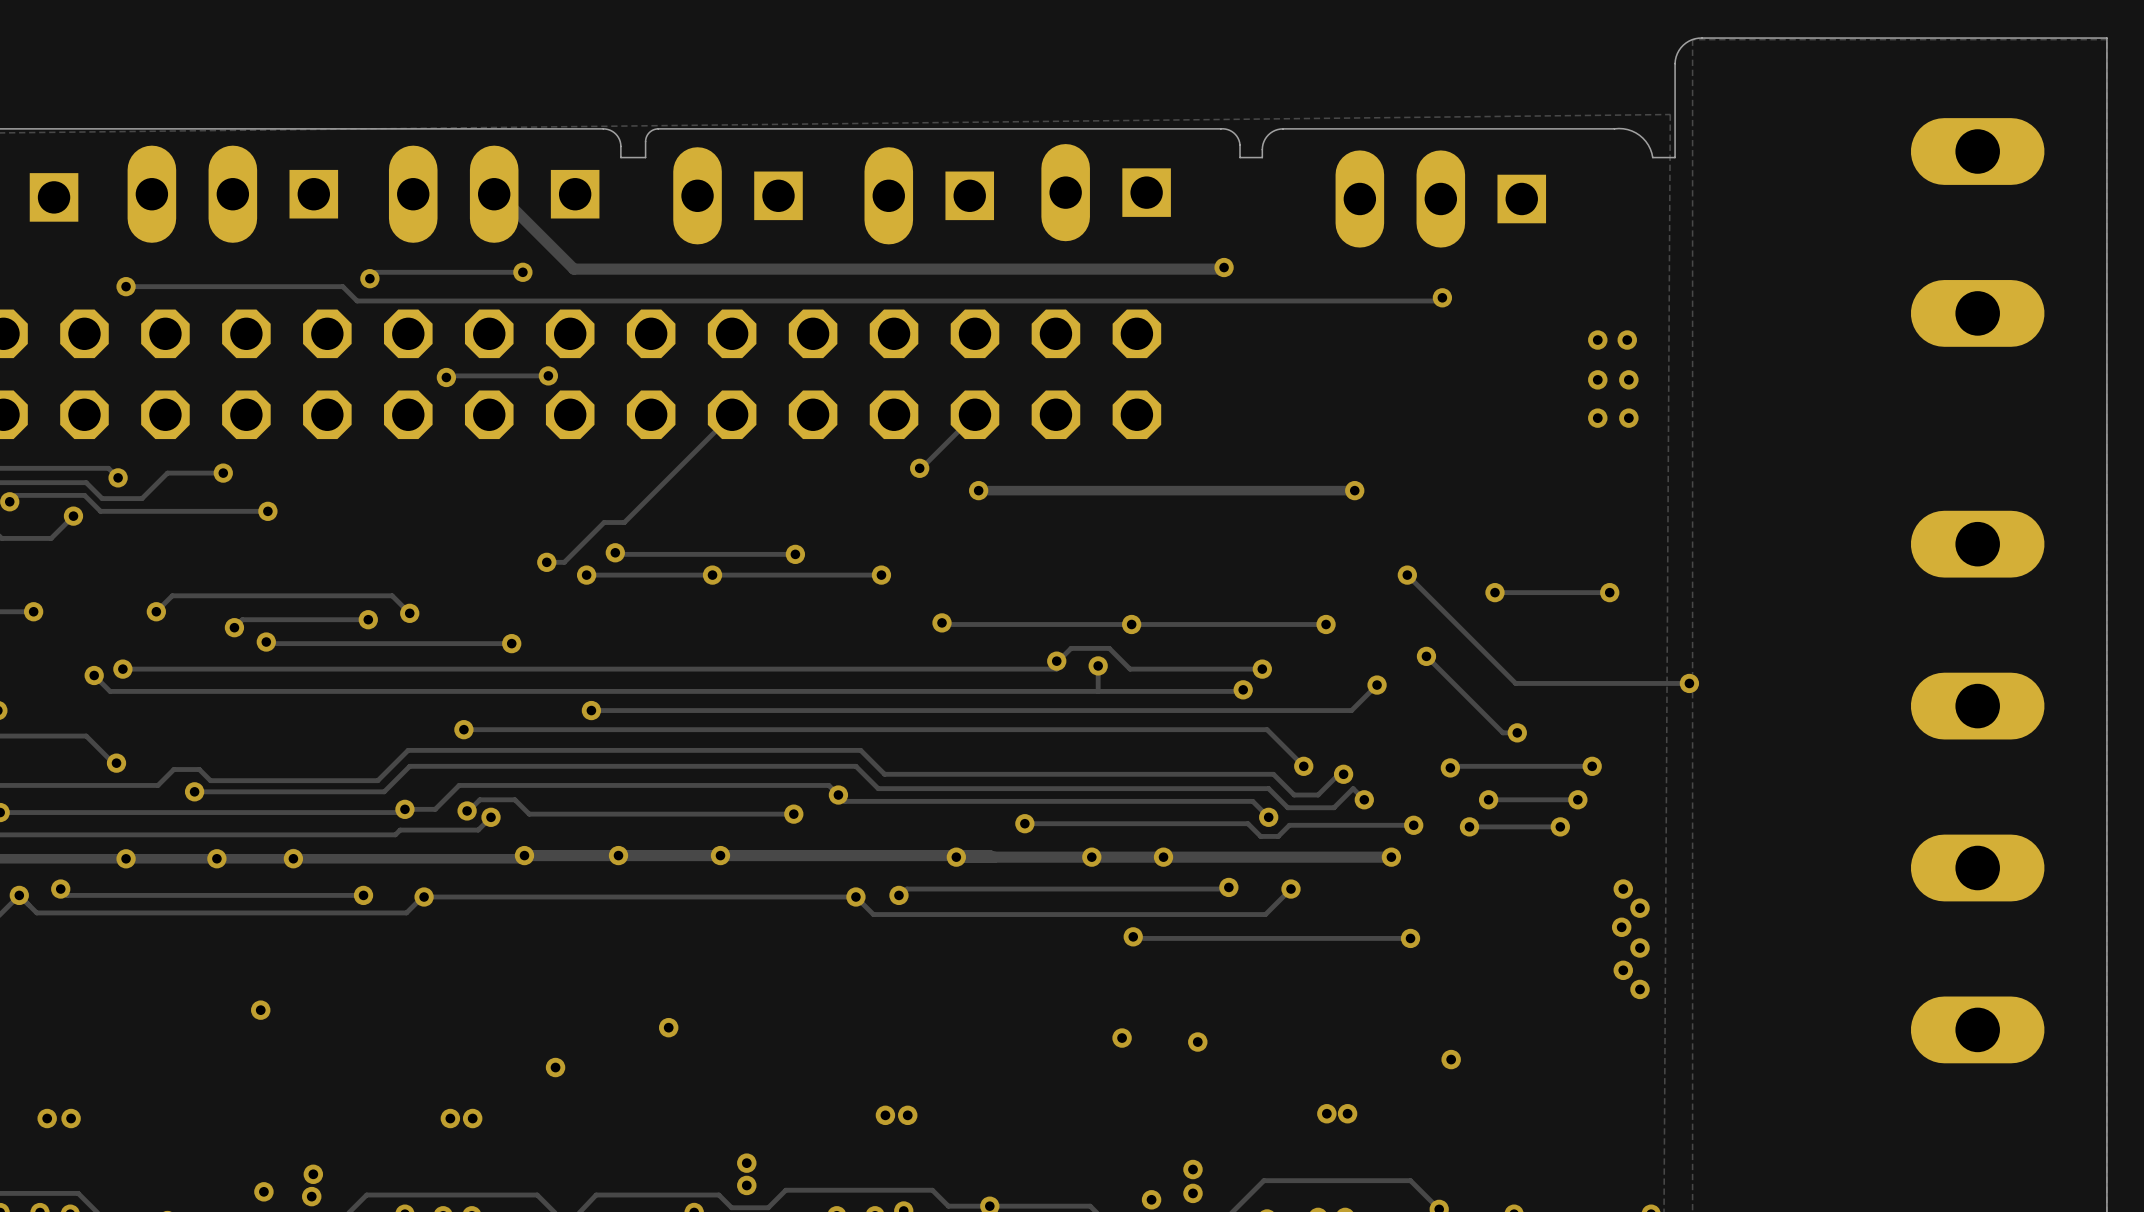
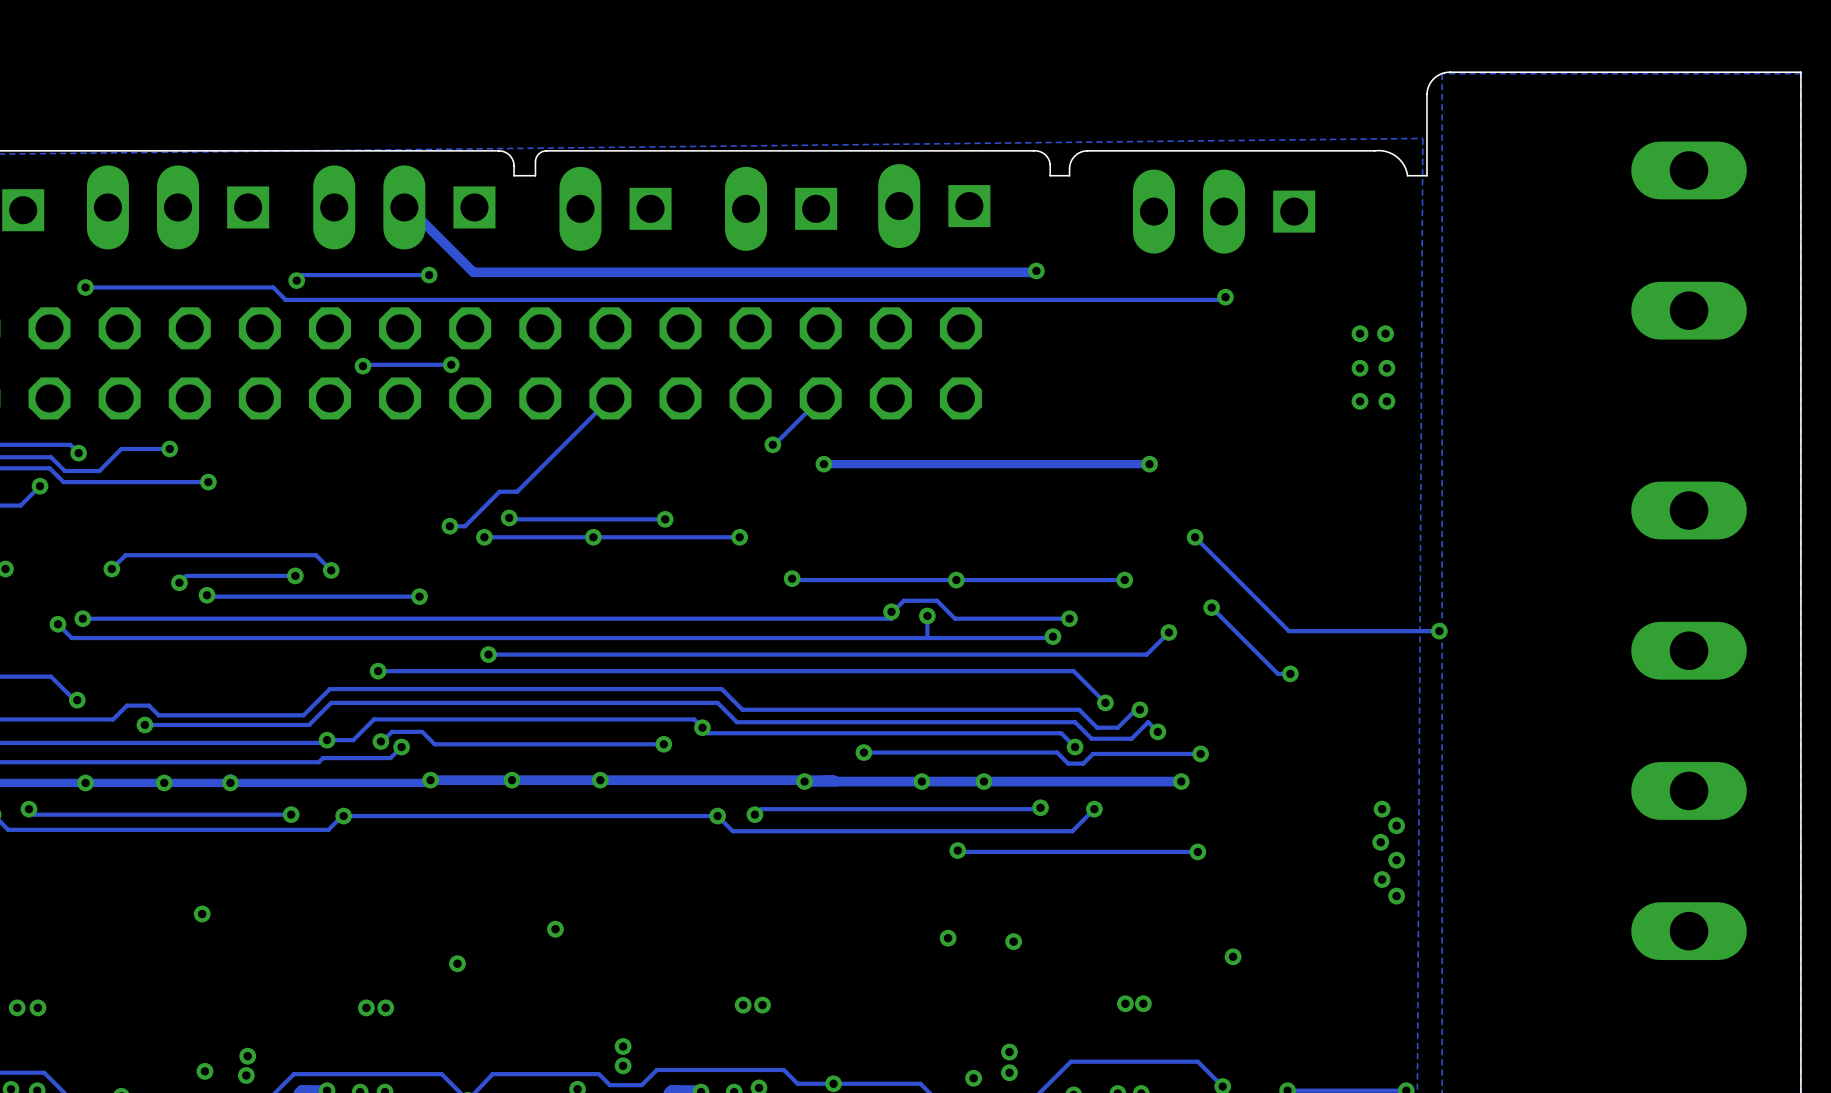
via: (1494, 592) -> none
track: (1609, 592) (1494, 592) -> none
via: (1609, 592) -> none
track: (1592, 766) (1451, 766) (1450, 767) -> none
via: (1592, 766) -> none
via: (1450, 767) -> none
via: (1488, 799) -> none
track: (1577, 799) (1488, 799) -> none
via: (1577, 799) -> none
via: (1469, 826) -> none
track: (1560, 826) (1469, 826) -> none
via: (1560, 826) -> none

